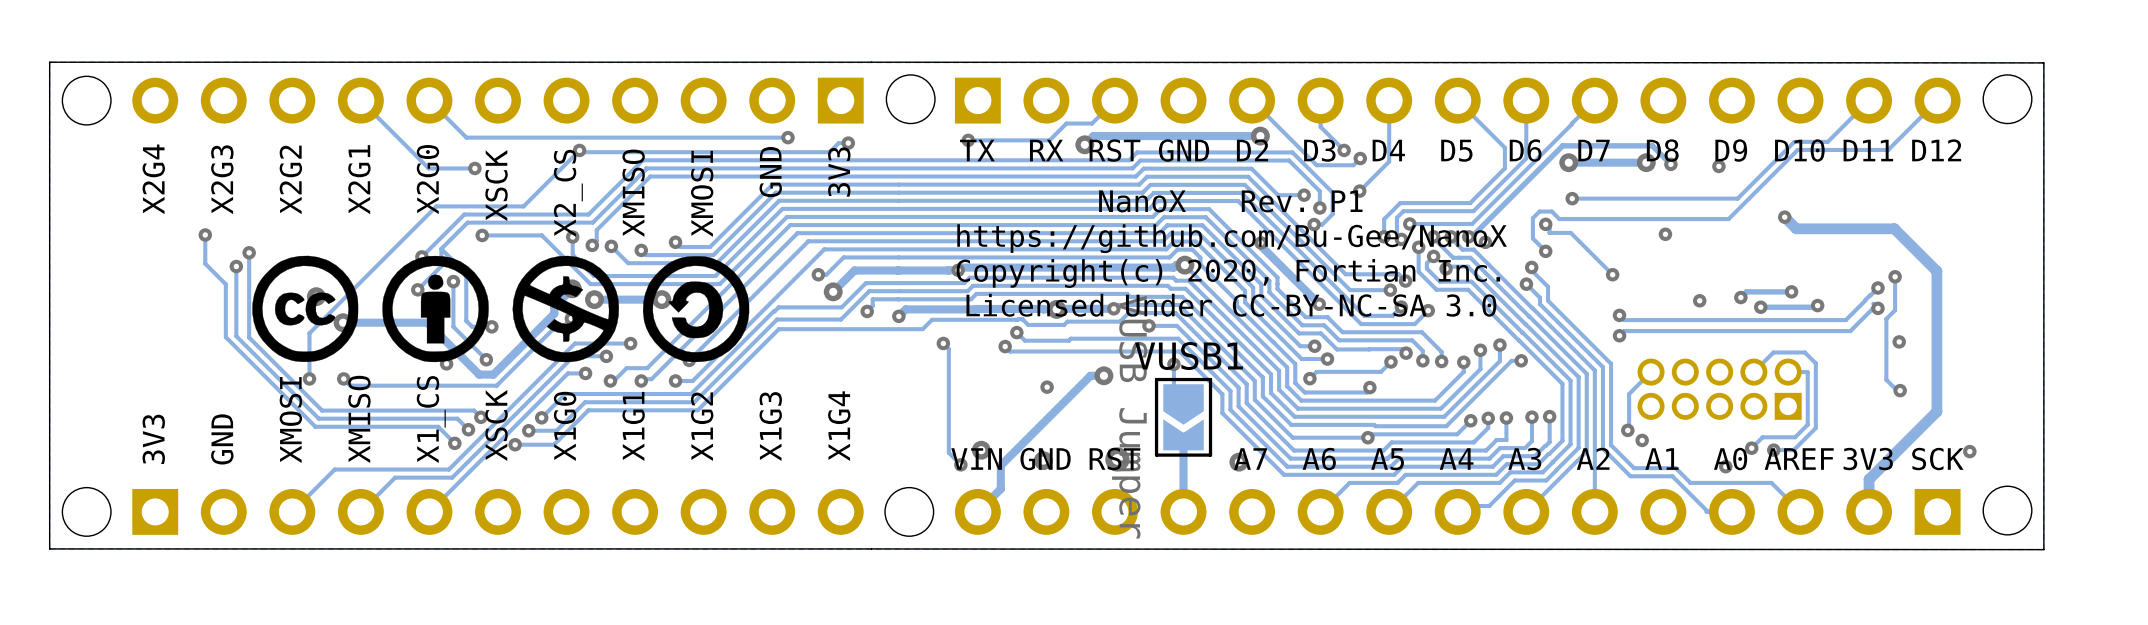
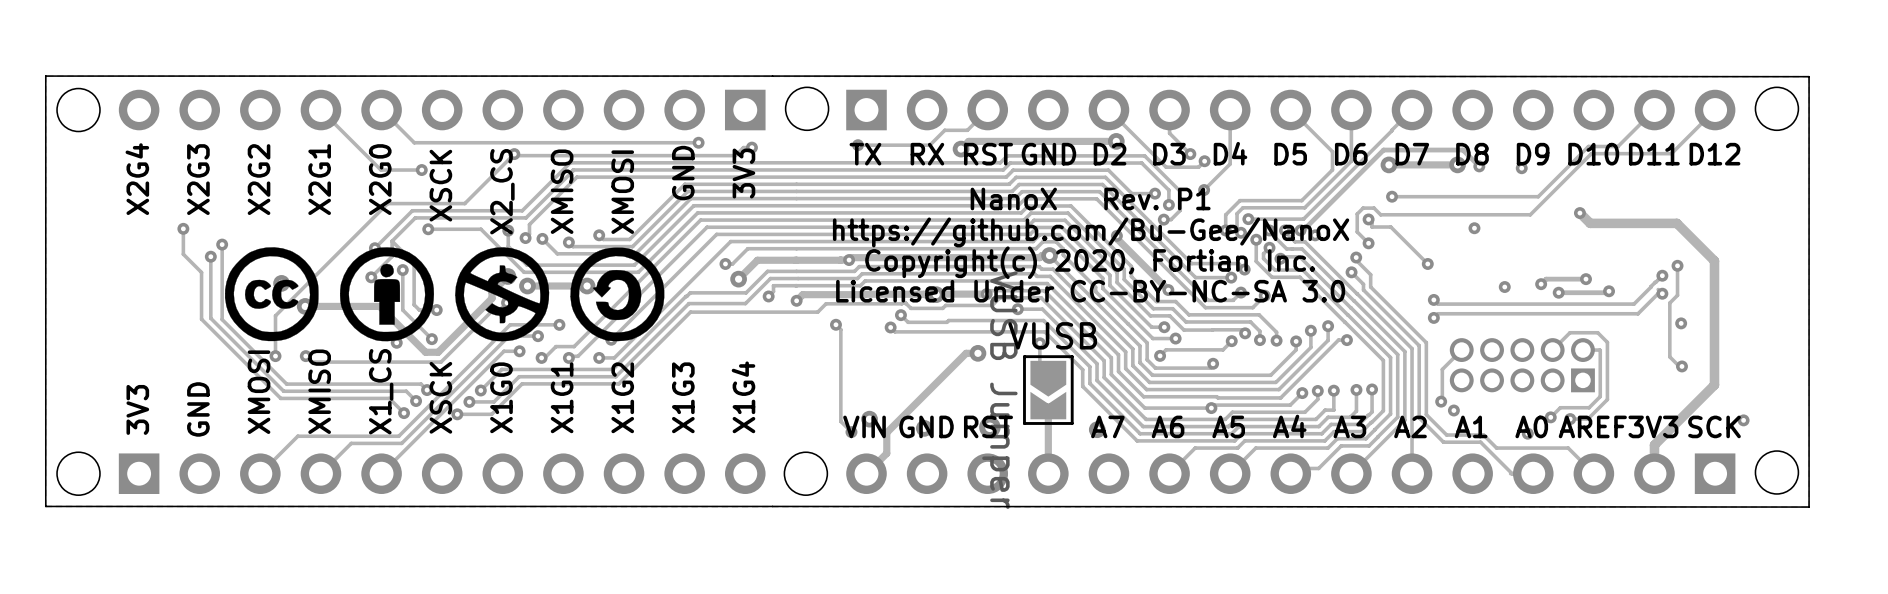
VUSB1 name: VUSB1 (1188, 356) -> VUSB (1052, 335)
via: (1047, 387) -> none

